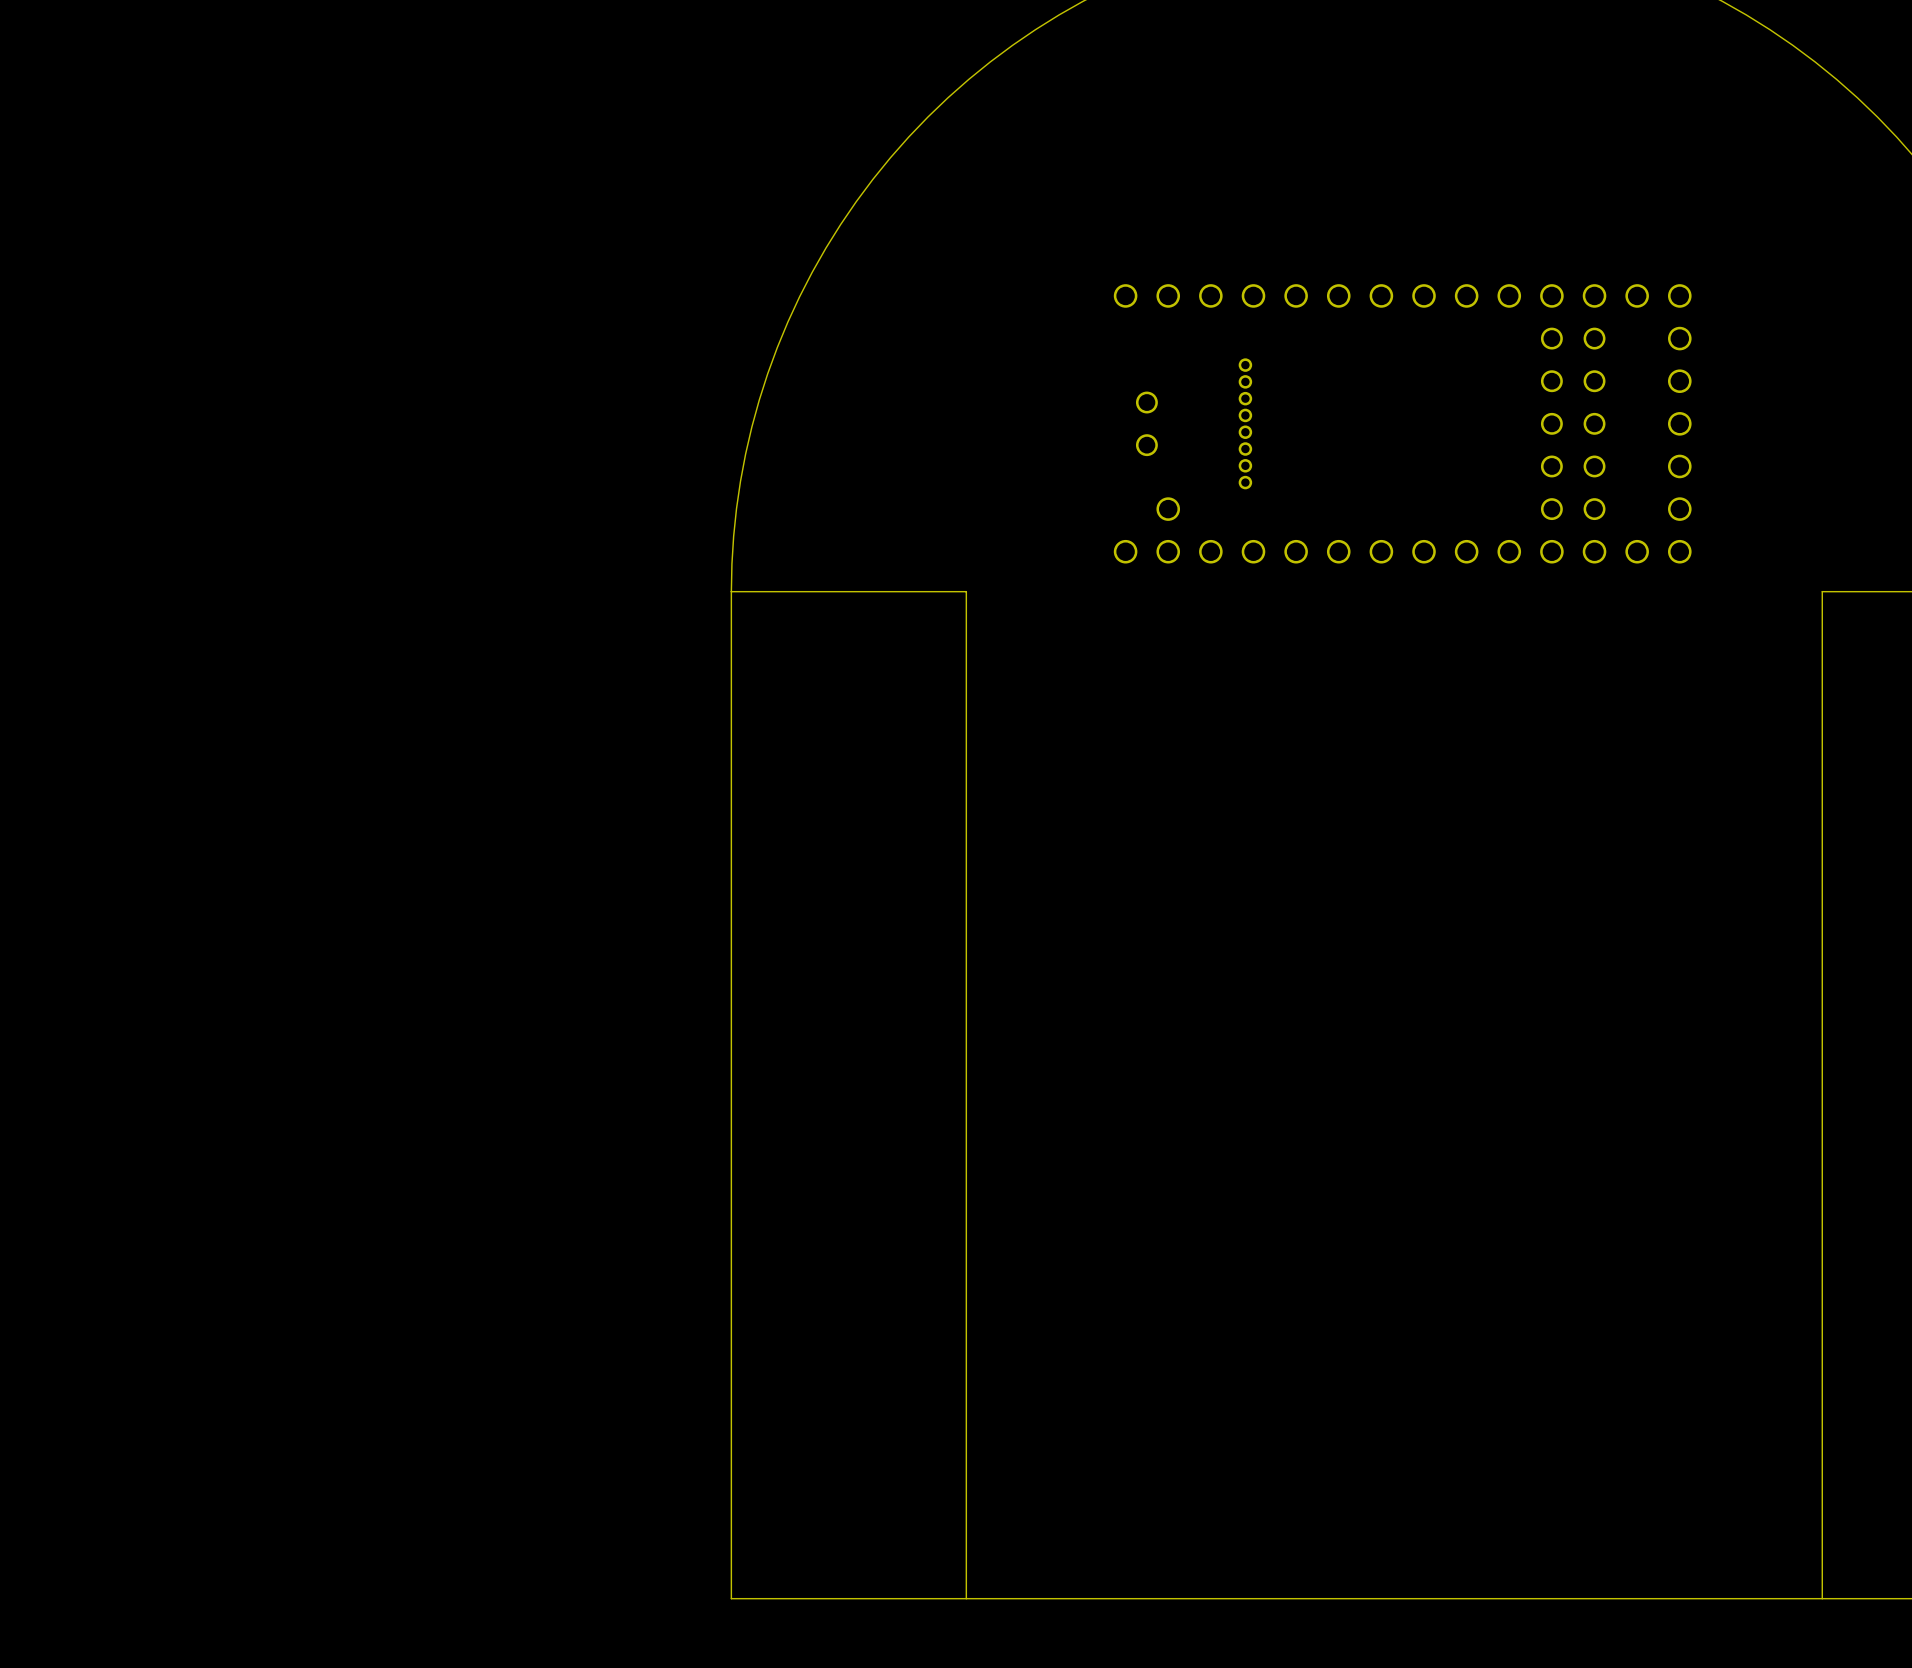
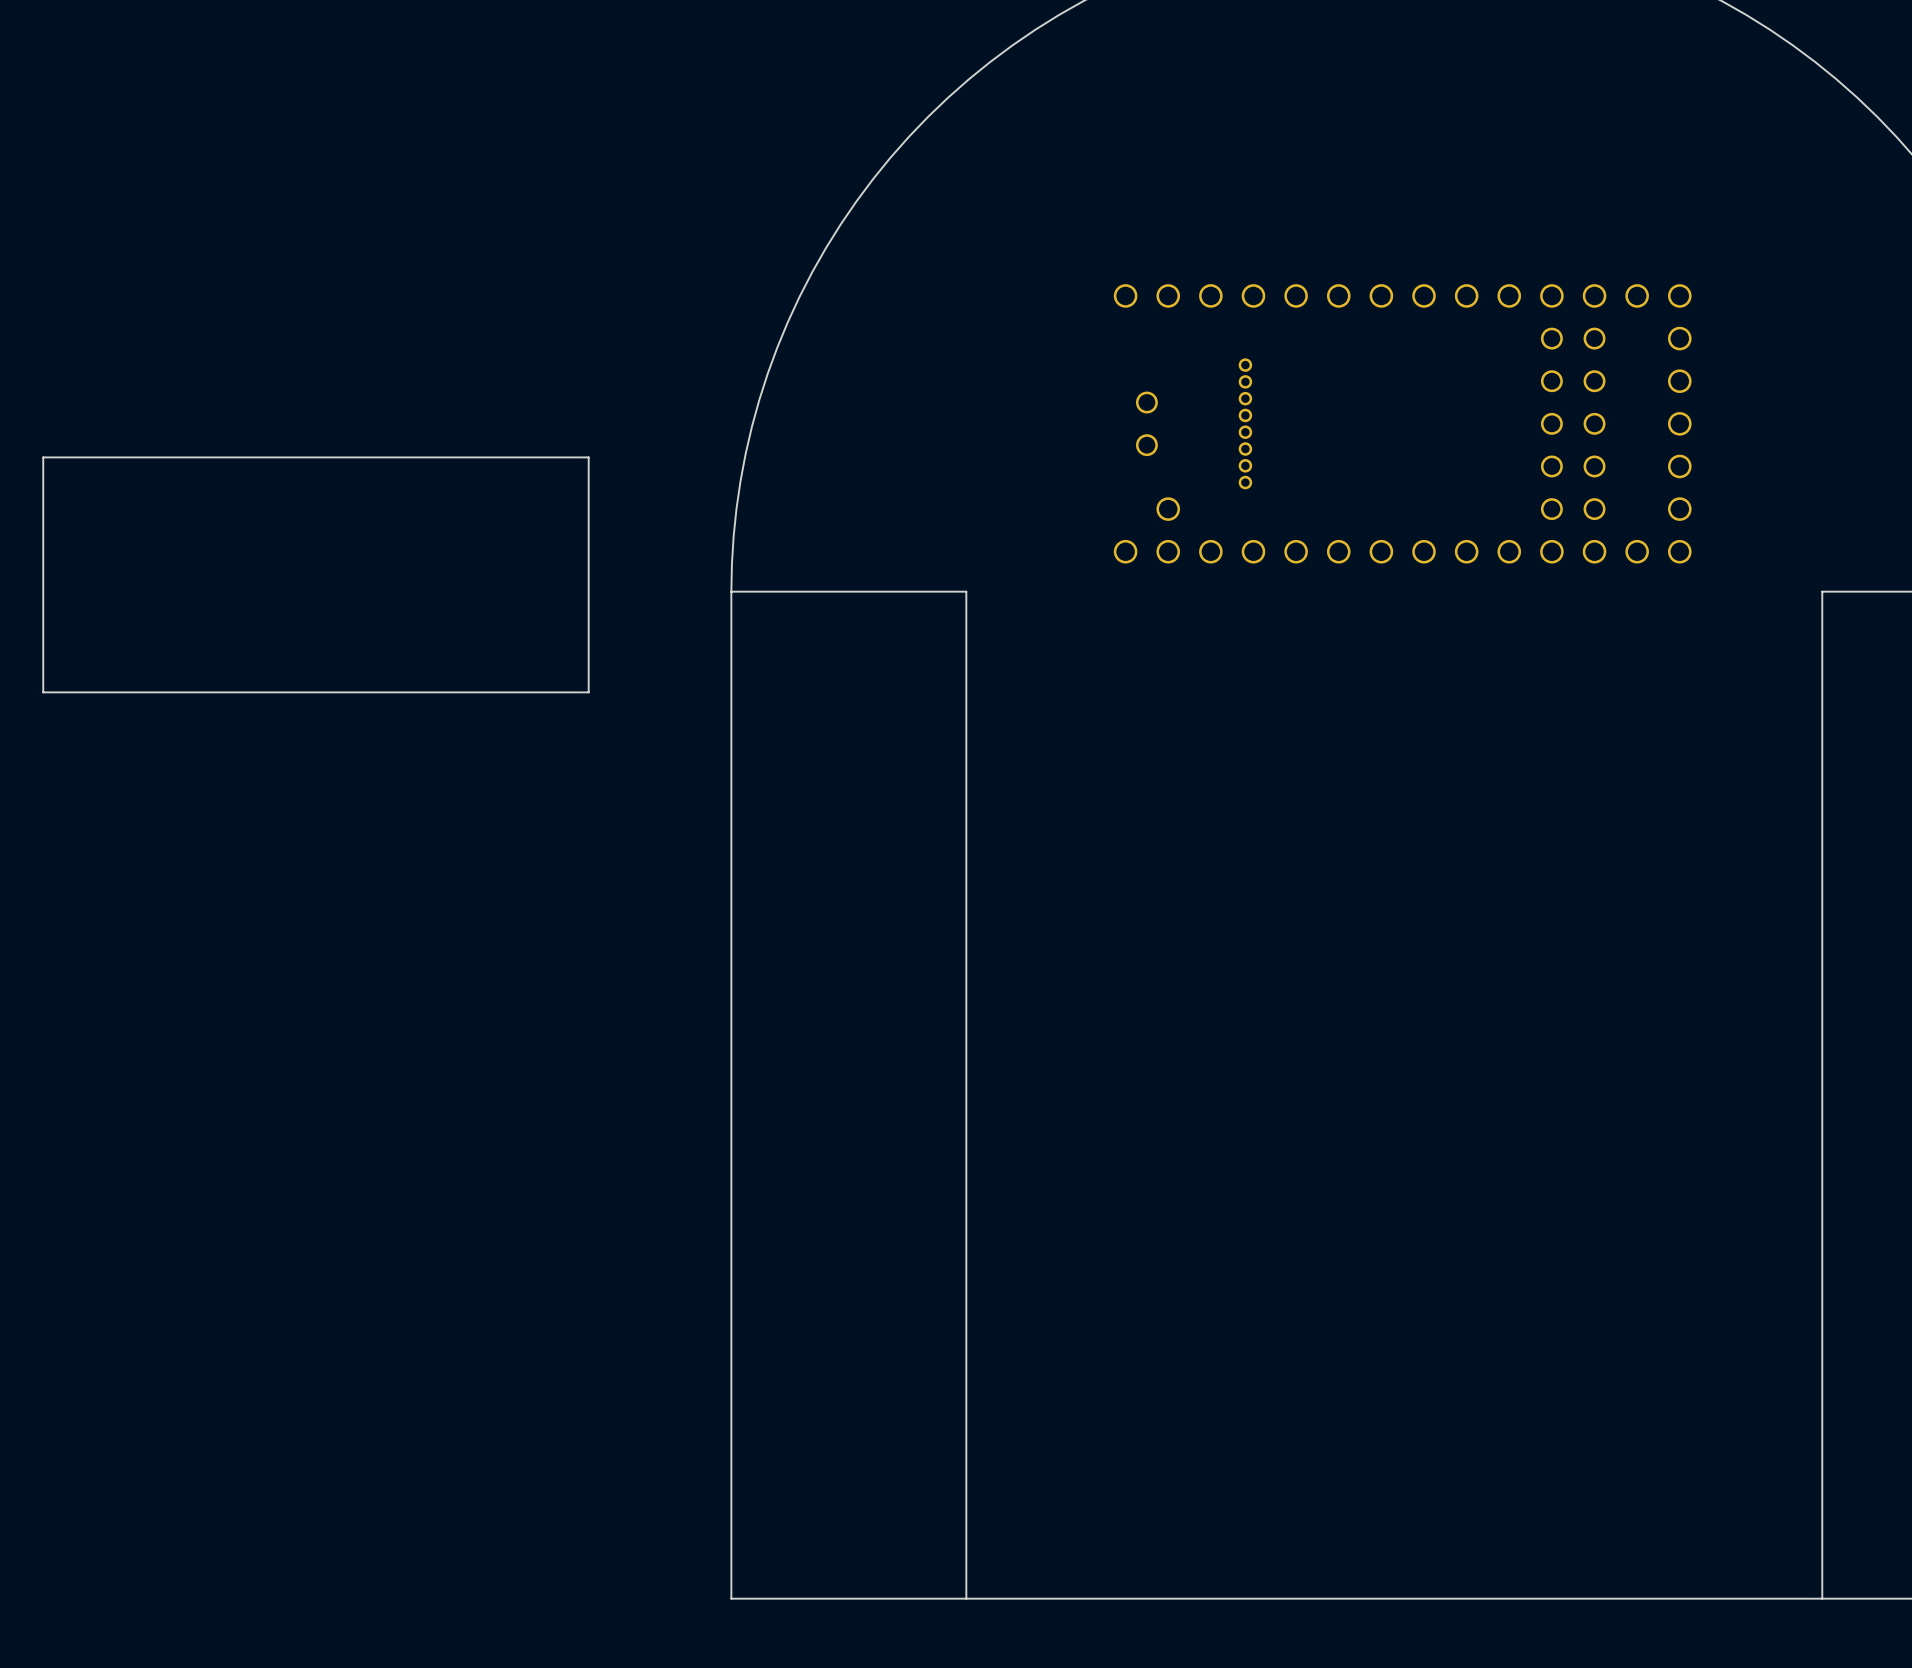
board edge: none -> (588, 457) (43, 457) (43, 692) (588, 692) (588, 457)

